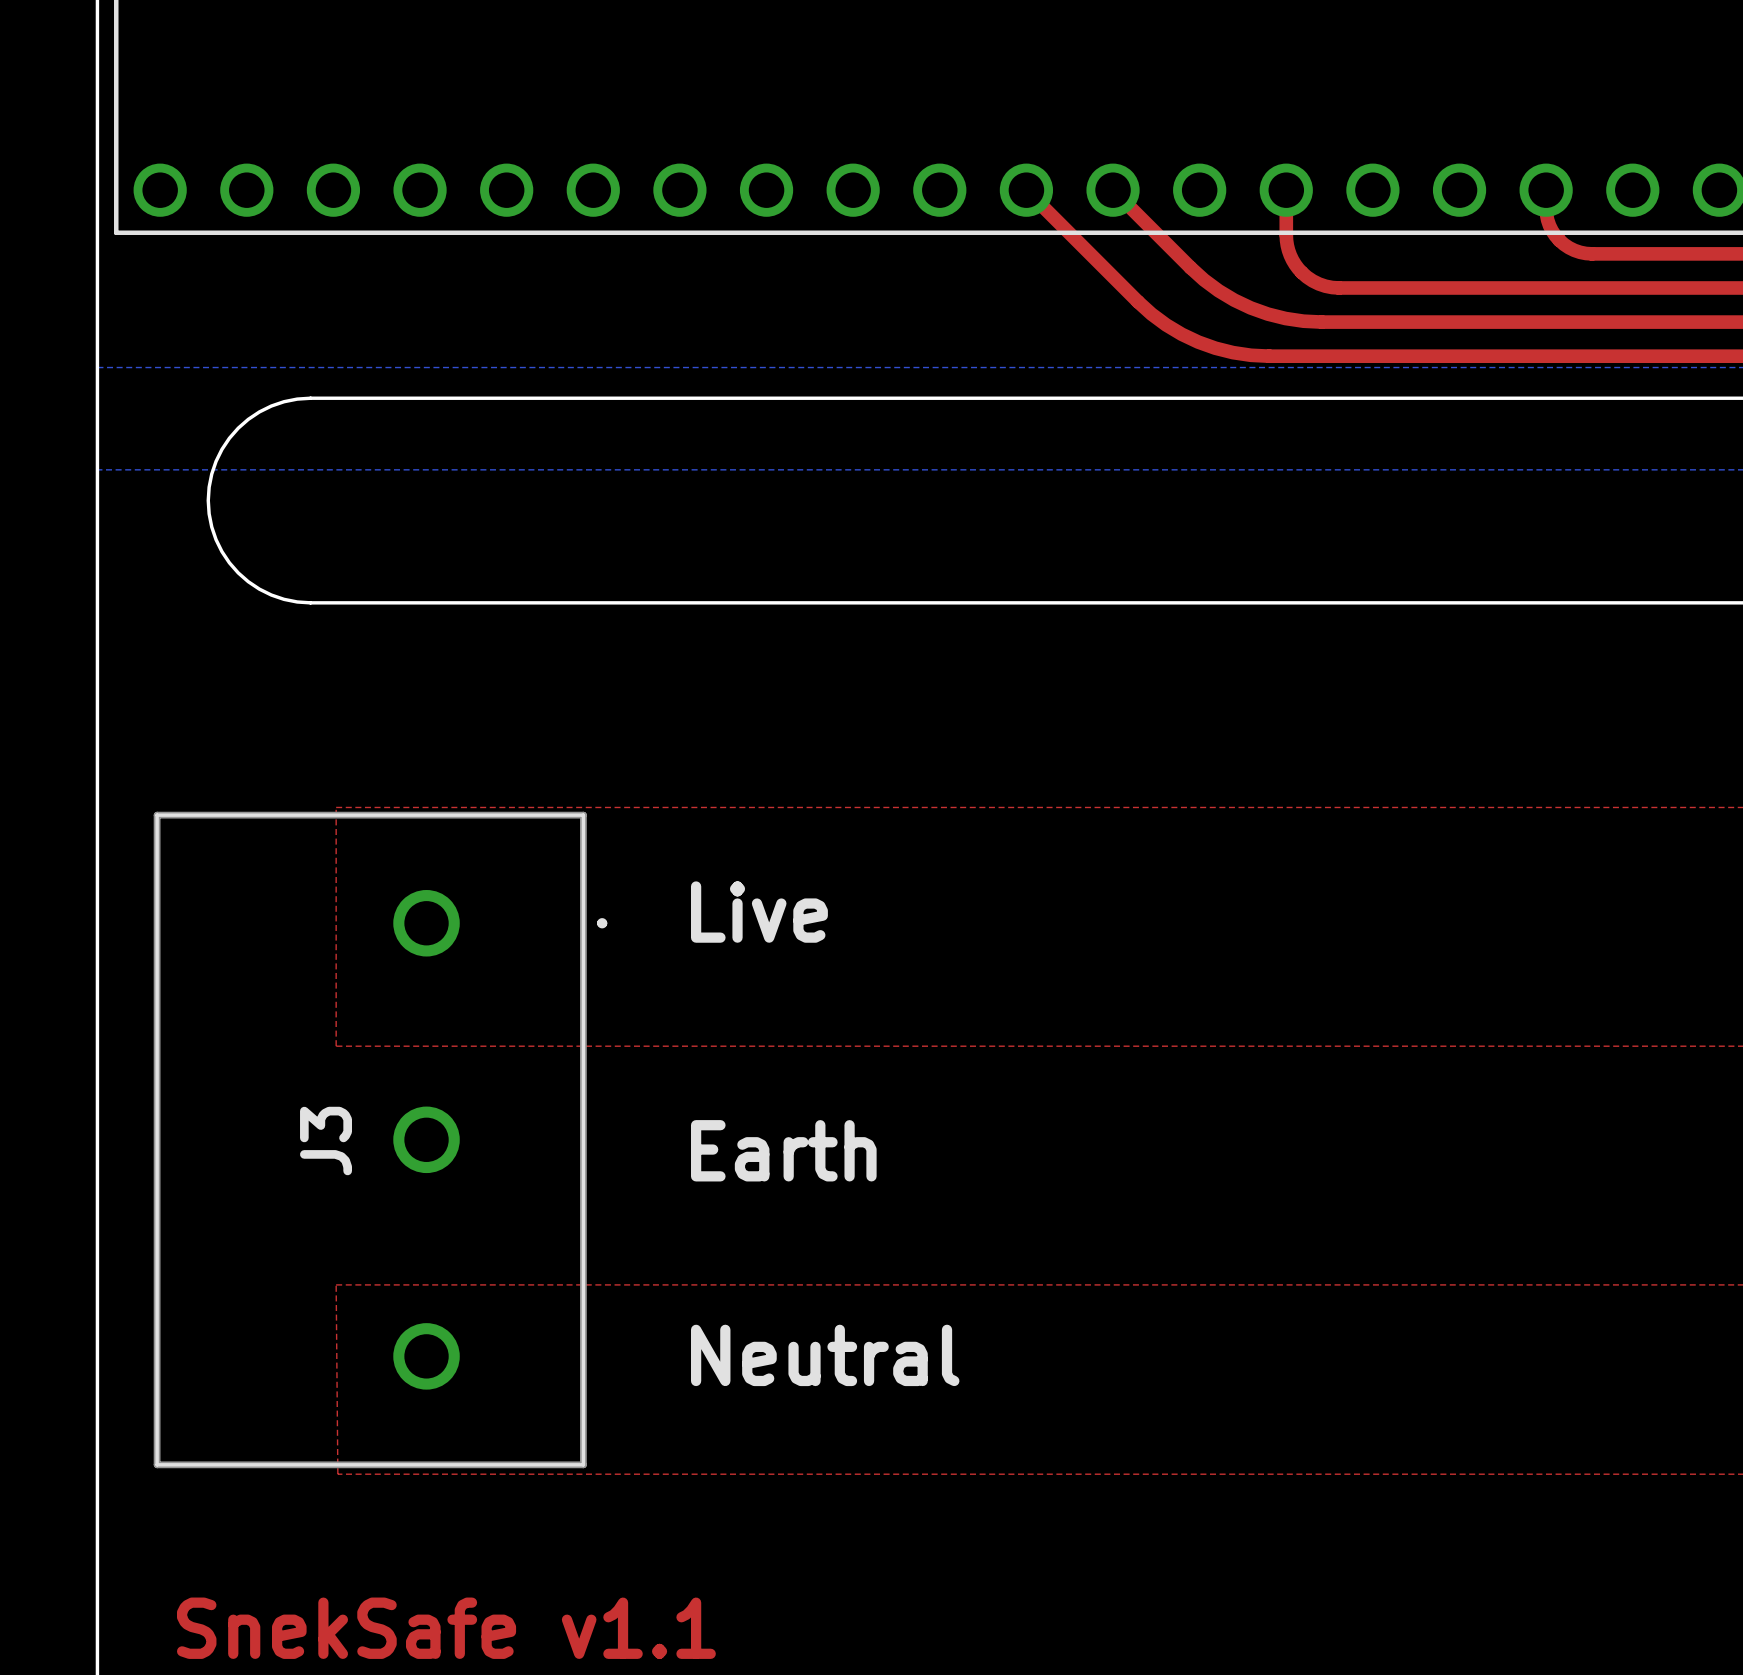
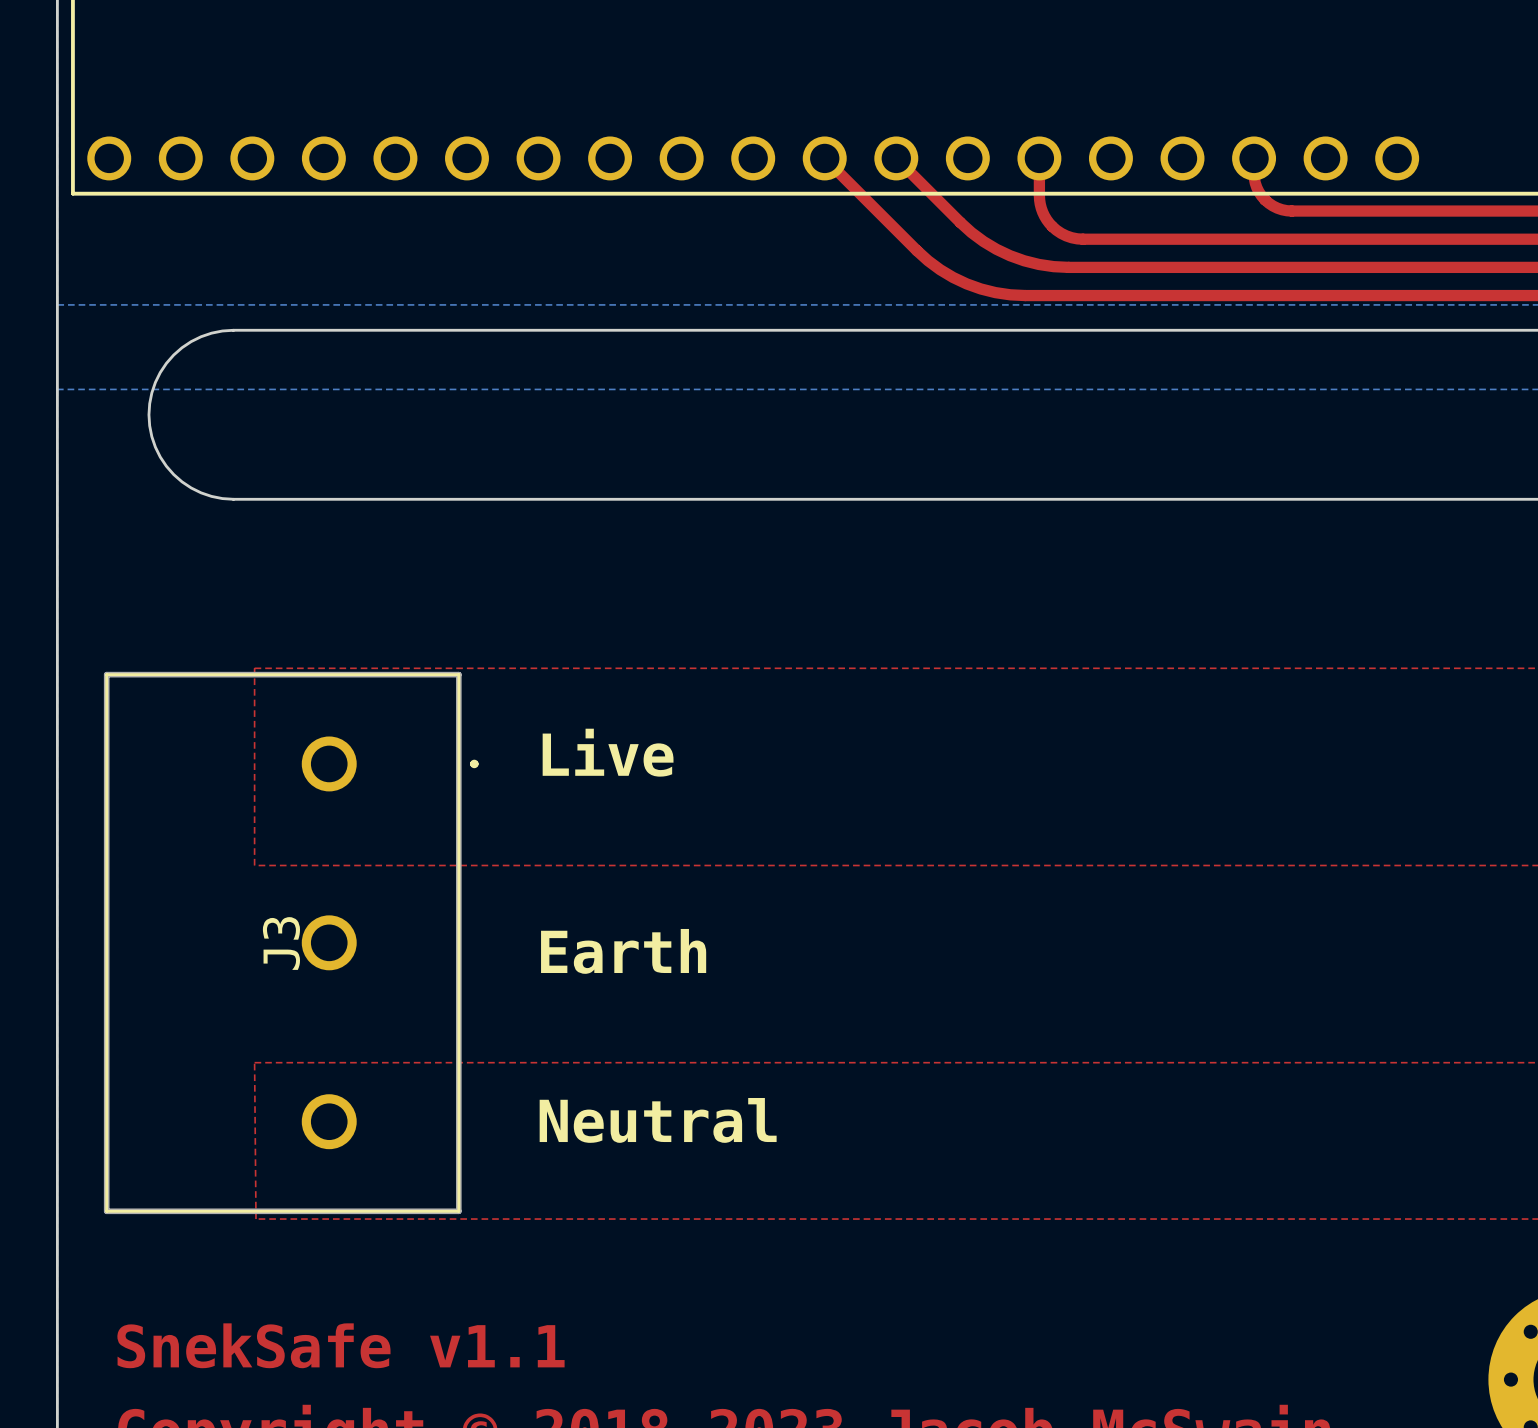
J3 name position: J3 (326, 1141) -> J3 (281, 943)

